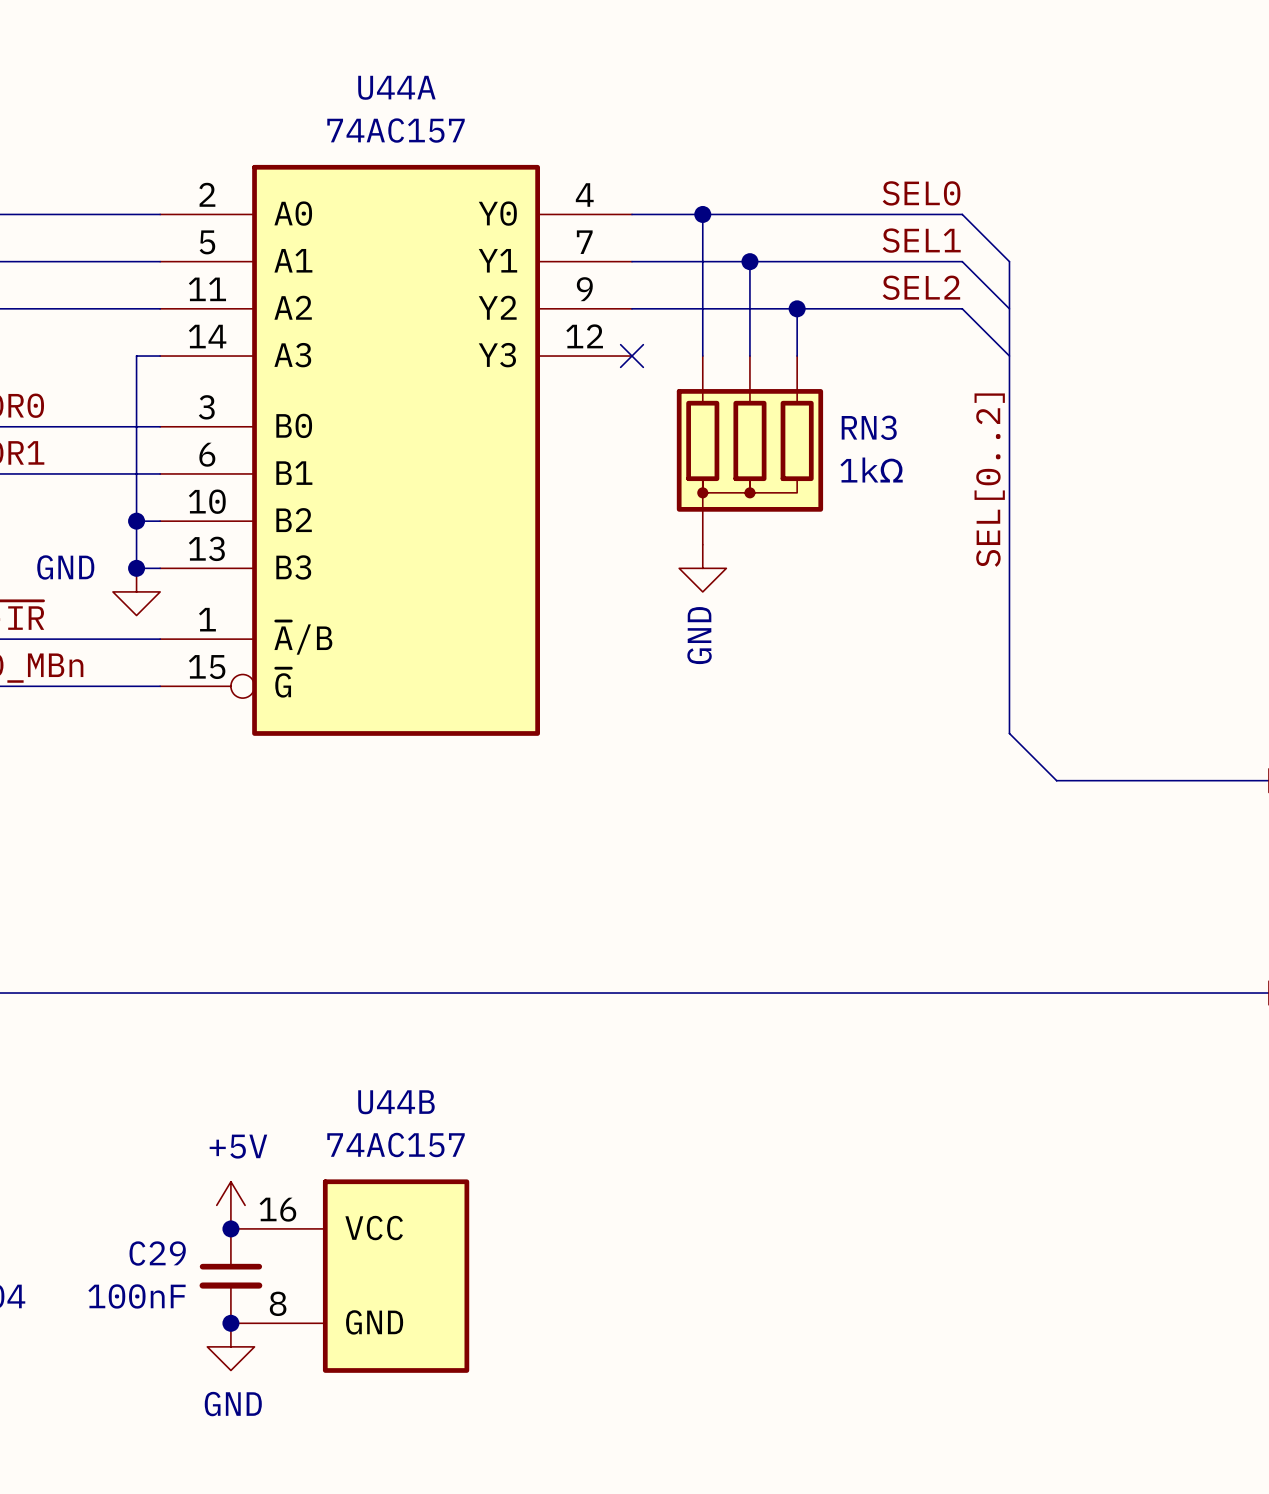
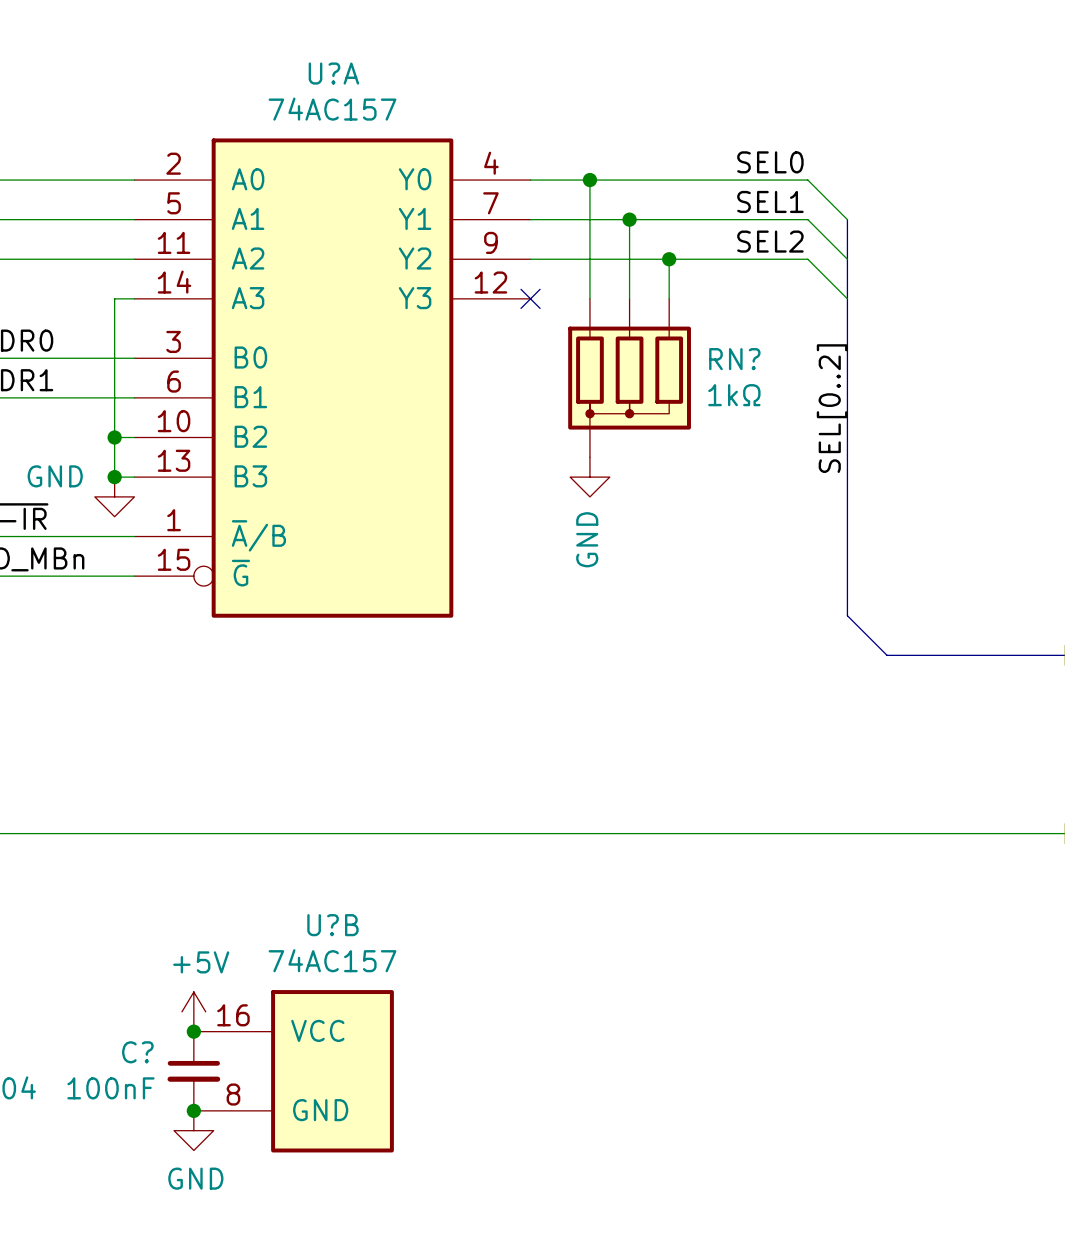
U44A name: U44A (396, 87) -> U?A (333, 73)
RN3 name: RN3 (869, 427) -> RN? (734, 359)
U44B name: U44B (396, 1102) -> U?B (332, 925)
C29 name: C29 (157, 1253) -> C? (137, 1052)

